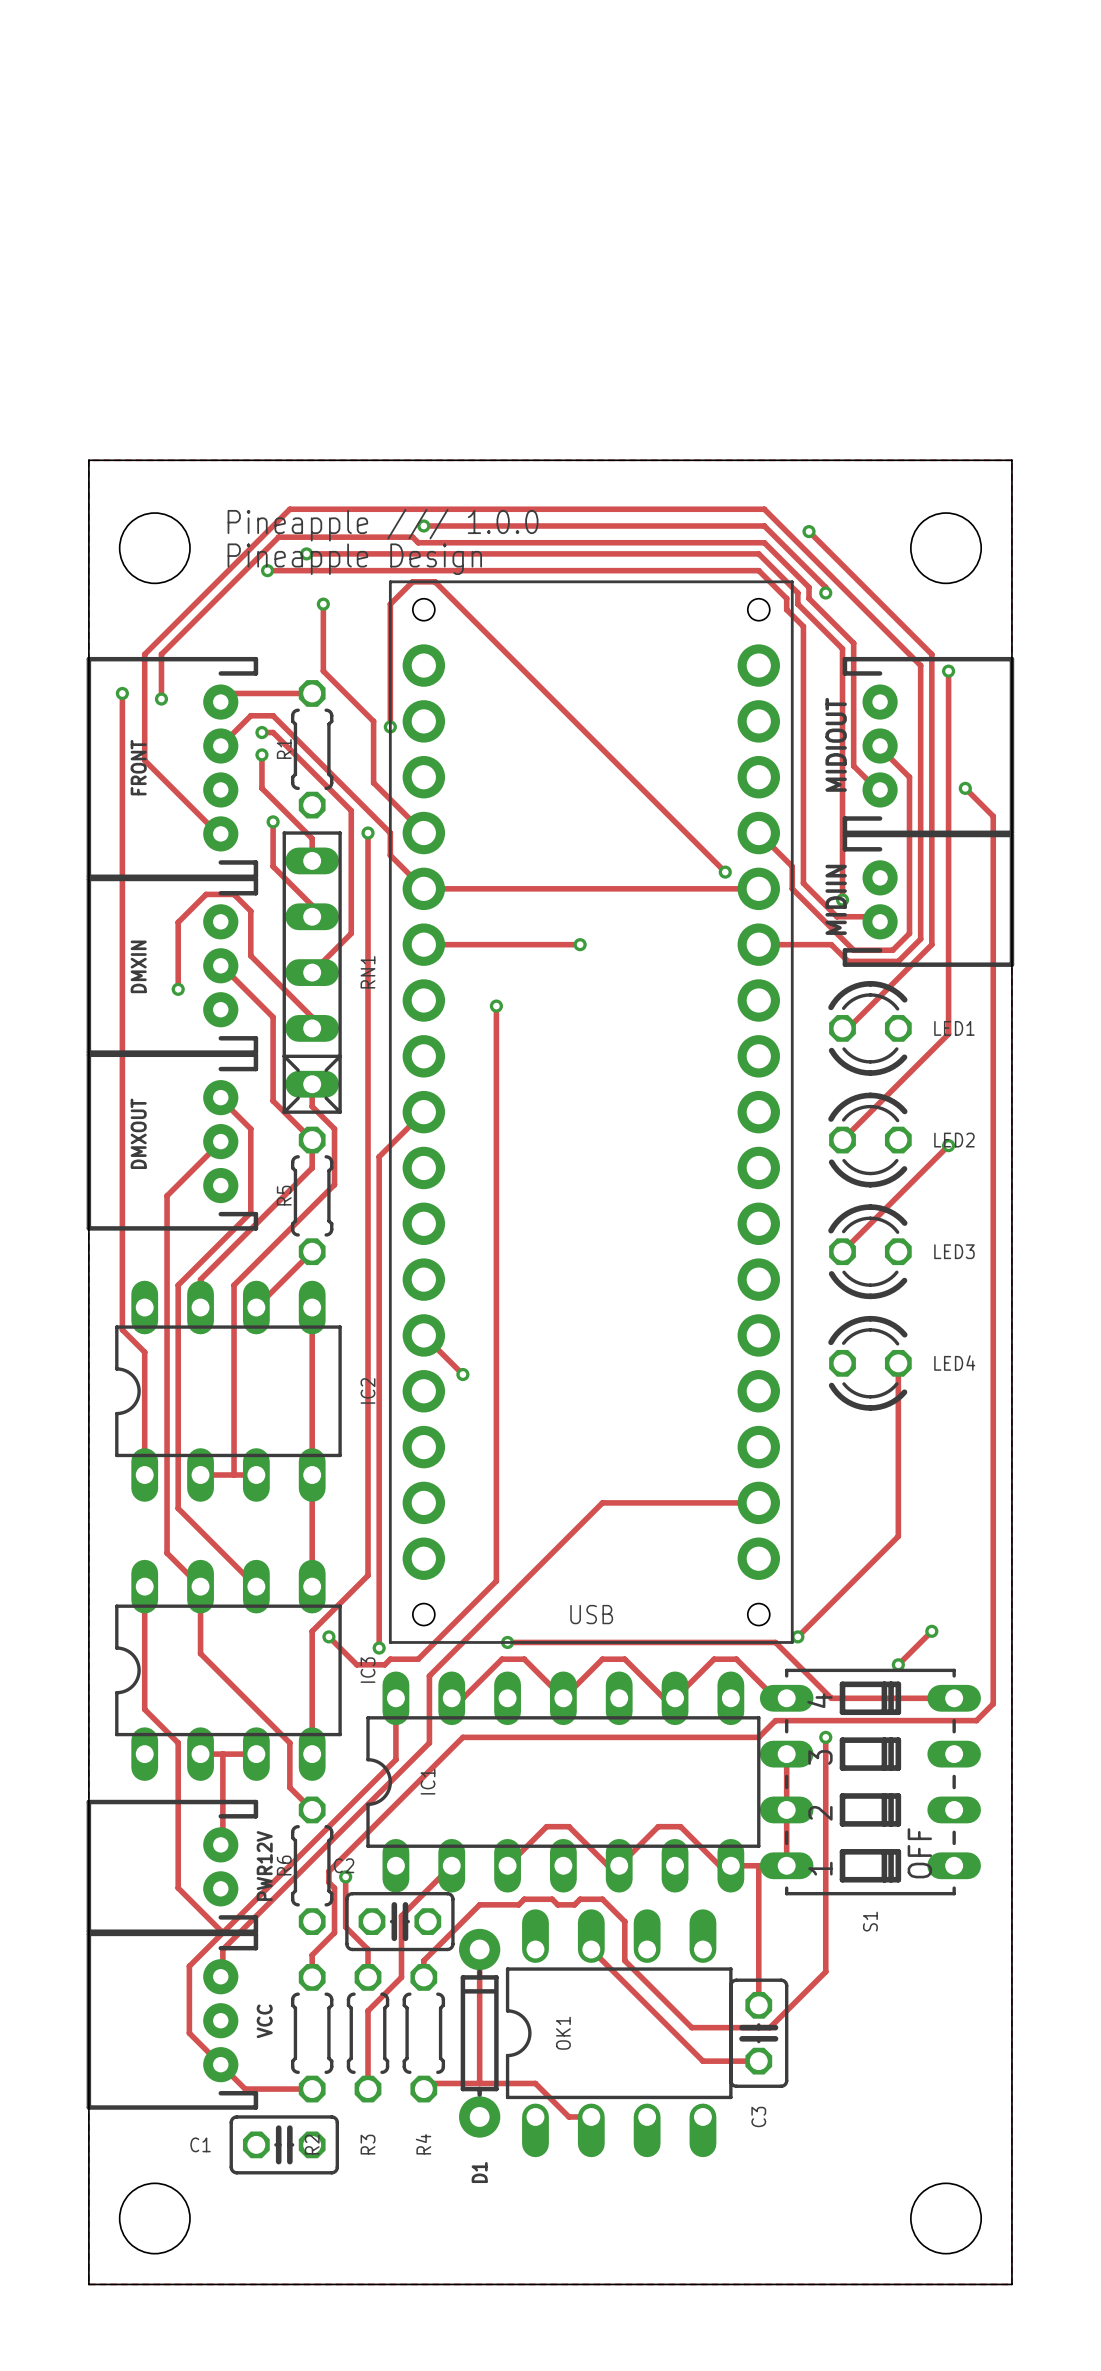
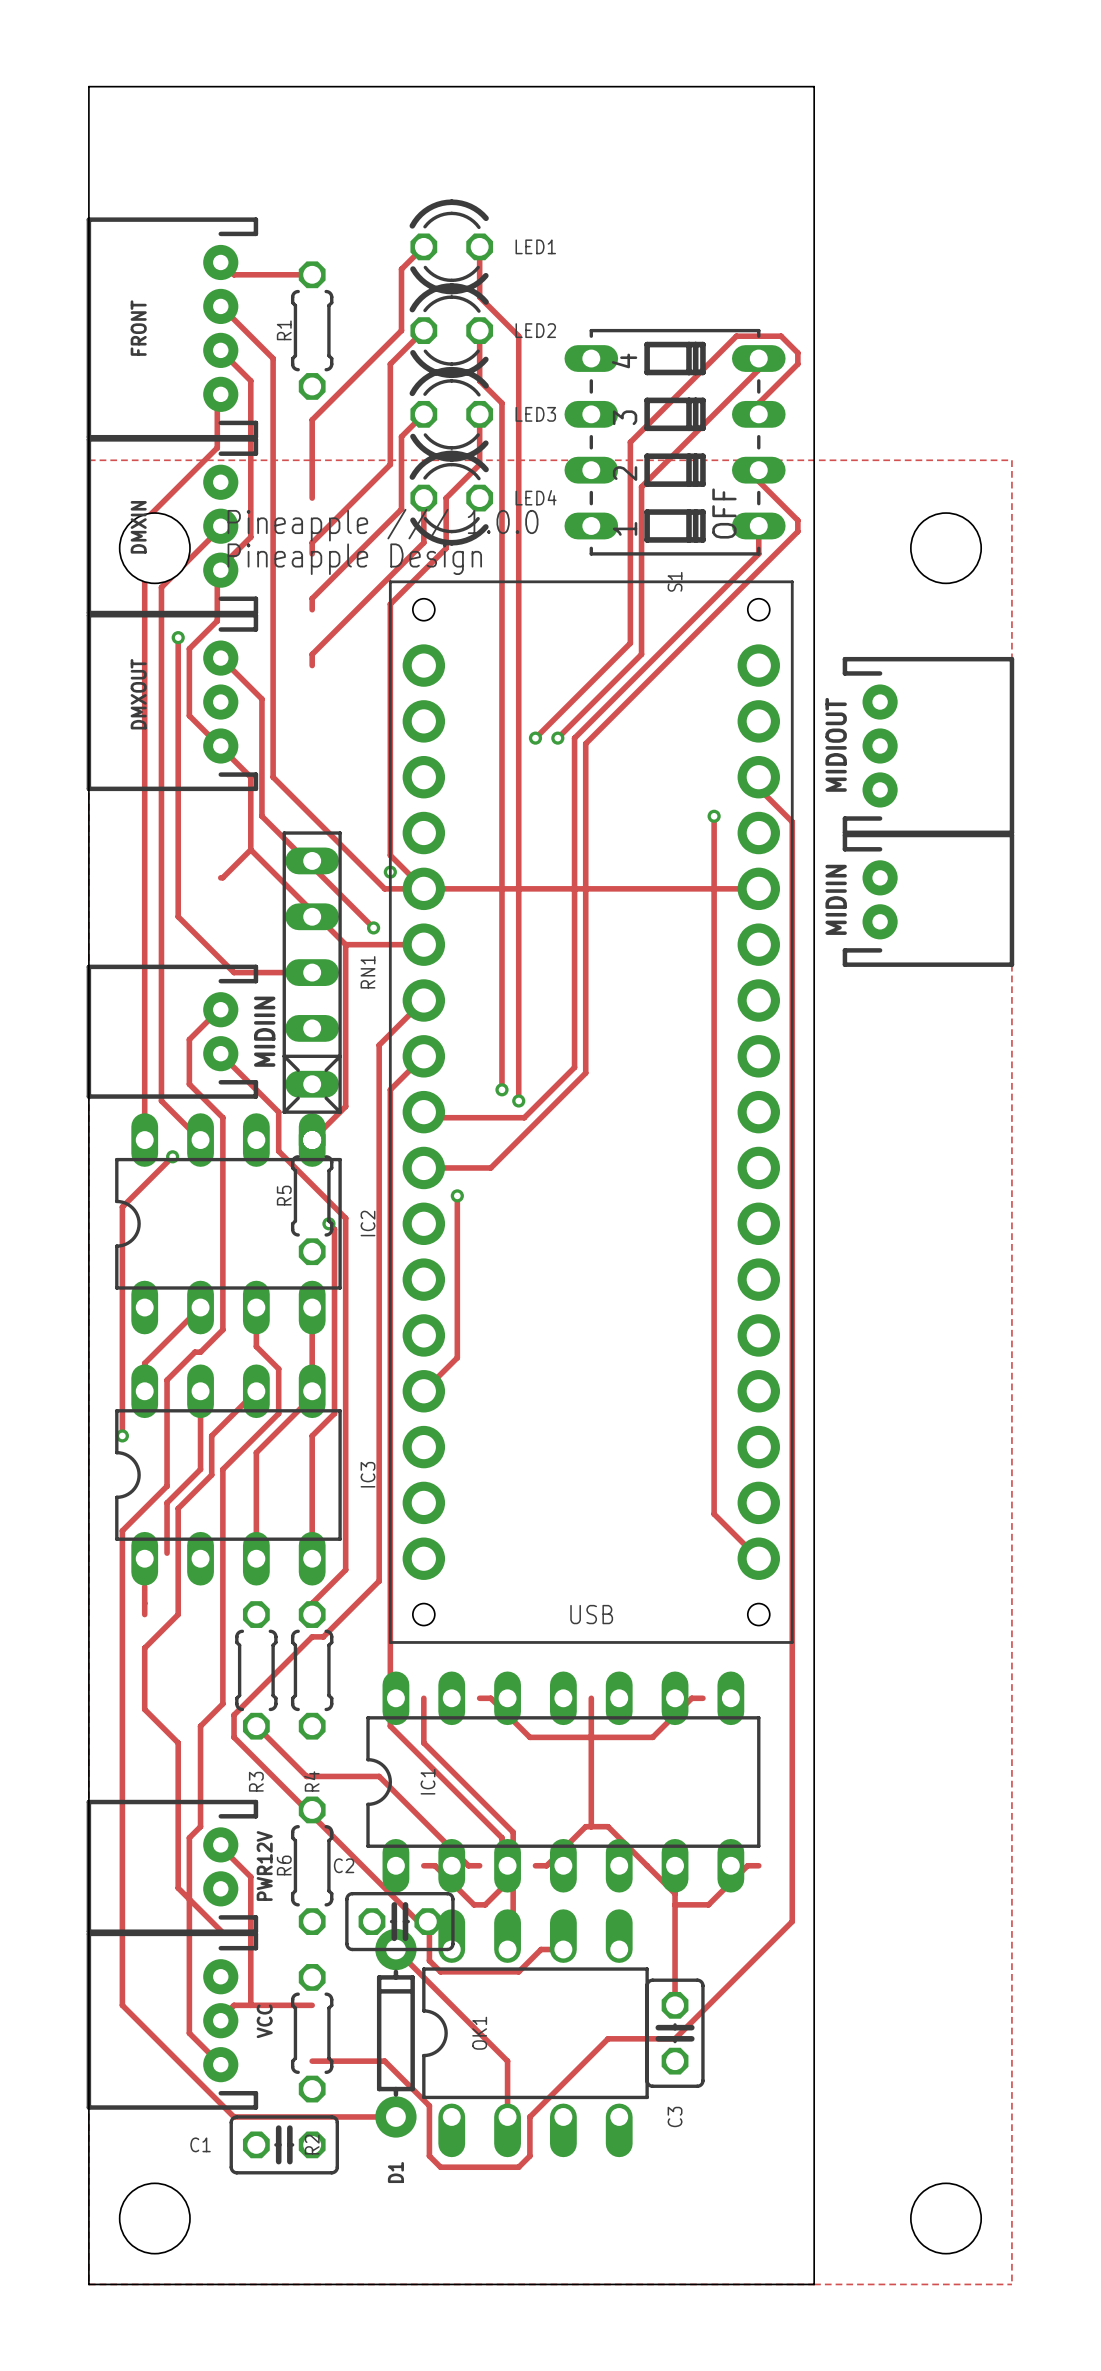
track: none -> (423, 246) (401, 269) (401, 330) (312, 419) (312, 498)
track: none -> (479, 246) (479, 297) (518, 336) (518, 1100)
track: none -> (220, 262) (234, 274) (312, 274)
track: none -> (220, 306) (273, 358) (273, 777) (384, 888) (423, 888)
track: none -> (423, 330) (390, 364) (390, 464) (312, 542) (312, 553)
track: none -> (479, 330) (479, 380) (501, 403) (501, 1089)
track: none -> (220, 350) (250, 380) (250, 537) (222, 565) (220, 570) (217, 570) (217, 620) (189, 648) (189, 715) (250, 777) (250, 849)
track: none -> (758, 358) (758, 369) (641, 486) (641, 654) (557, 738)
track: none -> (423, 414) (401, 436) (401, 509) (312, 598) (312, 609)
track: none -> (758, 414) (758, 403) (797, 364) (797, 352) (781, 336) (736, 336) (630, 442) (630, 643) (535, 738)
board edge: (88, 460) (1011, 460) (1011, 2284) (814, 2284) -> (88, 460) (88, 86) (814, 86) (814, 2284)
track: none -> (758, 470) (758, 481) (797, 520) (797, 531) (585, 743) (585, 1073) (490, 1167) (423, 1167)
track: none -> (423, 498) (423, 542) (312, 654) (312, 665)
track: (423, 526) (764, 526) (825, 587) (825, 592) -> none
via: (423, 526) -> none
track: none -> (758, 526) (758, 553) (574, 738) (574, 1067) (524, 1117) (429, 1117) (423, 1112)
track: (809, 531) (931, 654) (931, 944) (848, 1028) (842, 1028) -> none
via: (809, 531) -> none
track: (306, 553) (758, 553) (797, 592) (797, 604) (842, 648) (842, 900) -> none
via: (306, 553) -> none
track: (267, 570) (758, 570) (786, 598) (786, 609) (803, 626) (803, 883) (836, 916) (876, 916) (880, 921) -> none
via: (267, 570) -> none
track: (412, 581) (435, 581) (725, 872) -> (412, 581) (446, 548) (446, 498) (479, 464) (479, 414)
via: (825, 592) -> none
track: (323, 604) (323, 671) (373, 721) (373, 782) (423, 833) -> none
via: (323, 604) -> none
via: none -> (178, 637)
track: (144, 654) (289, 509) (764, 509) (920, 665) (920, 939) (898, 961) (848, 961) (831, 944) (758, 944) -> (144, 654) (144, 520) (217, 447) (217, 397) (220, 394)
track: (161, 654) (278, 537) (412, 537) (418, 542) (764, 542) (809, 587) (809, 598) (853, 643) (853, 766) (876, 788) (880, 789) -> (161, 654) (161, 587) (220, 526)
track: none -> (220, 658) (261, 699) (261, 754)
track: (948, 671) (948, 1033) (842, 1140) -> none
via: (948, 671) -> none
track: (122, 693) (122, 1207) -> (172, 1156) (122, 1207)
via: (122, 693) -> none
track: (312, 693) (228, 693) (220, 702) -> none
track: none -> (161, 699) (161, 1100) (200, 1140)
via: (161, 699) -> none
via: (390, 726) -> none
track: (261, 732) (273, 732) (351, 810) (351, 933) (312, 972) -> (178, 637) (178, 916) (234, 972) (312, 972)
via: (261, 732) -> none
via: none -> (535, 738)
via: none -> (557, 738)
track: (220, 745) (250, 715) (273, 715) (390, 833) -> (390, 726) (390, 833)
track: (880, 745) (909, 777) (909, 933) (892, 950) (853, 950) (792, 888) -> (312, 2061) (384, 2061) (429, 2105) (429, 2156) (440, 2167) (518, 2167) (529, 2156) (529, 2116) (608, 2038) (675, 2038) (792, 1921) (792, 888)
R1 position: (312, 749) -> (312, 330)
via: (261, 754) -> none
track: (144, 760) (217, 833) (220, 833) -> (144, 760) (144, 1140)
FRONT position: (172, 767) -> (172, 328)
track: (261, 788) (312, 838) (312, 860) -> (261, 788) (261, 816) (373, 927)
track: (965, 788) (993, 816) (993, 1703) (976, 1720) (775, 1720) (758, 1737) (652, 1737) -> (702, 1698) (691, 1698) (652, 1737)
via: (965, 788) -> none
track: none -> (714, 816) (714, 1514) (758, 1558)
track: (273, 821) (273, 866) (312, 905) (312, 916) -> none
via: (273, 821) -> none
track: (368, 833) (368, 1575) (312, 1631) (312, 1754) -> none
via position: (368, 833) -> (390, 872)
track: (758, 833) (792, 866) -> (758, 777) (758, 788) (792, 821) (792, 866)
track: none -> (250, 849) (220, 877)
track: none -> (250, 849) (345, 944)
via position: (725, 872) -> (714, 816)
via: (842, 900) -> none
via: none -> (373, 927)
track: none -> (345, 944) (345, 1106) (312, 1140)
track: (423, 944) (580, 944) -> (423, 944) (345, 944)
via: (580, 944) -> none
DMXIN position: (172, 965) -> (172, 526)
track: (220, 965) (273, 1017) (273, 1100) (312, 1140) (312, 1167) (200, 1279) (200, 1307) -> (144, 1363) (200, 1307)
track: (178, 989) (178, 922) (206, 894) (234, 894) (250, 911) (250, 955) (312, 1017) (312, 1028) -> none
via: (178, 989) -> none
track: (496, 1006) (496, 1581) (418, 1659) (390, 1659) (384, 1664) (356, 1664) (328, 1636) -> none
via: (496, 1006) -> none
LED1 position: (869, 1028) -> (451, 246)
MIDIIN: none -> (172, 1031)
track: none -> (220, 1053) (278, 1112) (278, 1151) (345, 1218) (345, 1569) (312, 1603) (312, 1614)
track: (312, 1084) (312, 1106) (334, 1128) (334, 1184) (234, 1285) (234, 1475) -> none
via: none -> (501, 1089)
track: (220, 1097) (250, 1128) (250, 1212) (178, 1285) (178, 1508) (256, 1586) -> none
via: none -> (518, 1100)
track: (423, 1112) (379, 1156) -> (423, 1000) (379, 1045) (379, 1156)
LED2 position: (869, 1140) -> (451, 330)
DMXOUT position: (172, 1141) -> (172, 702)
track: (220, 1141) (167, 1195) (167, 1380) -> (220, 1009) (189, 1039) (189, 1084) (222, 1117) (222, 1329) (200, 1352) (194, 1352) (167, 1380)
track: (948, 1145) (842, 1251) -> none
via: (948, 1145) -> none
via: none -> (172, 1156)
track: none -> (457, 1195) (457, 1357) (423, 1391)
via: none -> (457, 1195)
track: none -> (328, 1223) (334, 1229) (334, 1413) (312, 1435)
via: none -> (328, 1223)
track: (312, 1251) (256, 1307) -> none
LED3 position: (869, 1251) -> (451, 414)
track: (122, 1329) (144, 1352) (144, 1363) -> (122, 1329) (122, 1435)
track: (423, 1335) (462, 1374) -> none
LED4 position: (869, 1363) -> (451, 498)
track: (898, 1363) (898, 1536) (797, 1636) -> none
via: (462, 1374) -> none
track: (144, 1391) (144, 1475) -> none
IC2 position: (228, 1391) -> (228, 1223)
track: (312, 1396) (312, 1435) -> (312, 1396) (256, 1452) (256, 1558)
via: none -> (122, 1435)
track: (200, 1475) (256, 1475) -> none
track: (167, 1486) (167, 1502) -> (200, 1391) (200, 1469) (167, 1502)
track: none -> (167, 1486) (122, 1530) (122, 2005) (234, 2116) (395, 2116)
track: (758, 1502) (602, 1502) (429, 1675) (429, 1742) (222, 1949) (222, 1971) (220, 1976) -> none
track: (167, 1553) (200, 1586) (200, 1653) (289, 1742) (289, 1787) (312, 1809) -> none
track: (379, 1581) (379, 1648) -> (379, 1581) (323, 1636) (312, 1636) (234, 1715) (234, 1737) (429, 1932) (429, 1960) (440, 1971) (518, 1971) (541, 1949) (563, 1949)
track: (144, 1614) (144, 1648) -> (256, 1391) (211, 1435) (211, 1475) (178, 1508) (178, 1614) (144, 1648)
track: (931, 1631) (898, 1664) -> none
via: (931, 1631) -> none
via: (328, 1636) -> none
via: (797, 1636) -> none
track: (507, 1642) (775, 1642) (831, 1698) (954, 1698) -> none
via: (507, 1642) -> none
via: (379, 1648) -> none
via: (898, 1664) -> none
IC3 position: (228, 1670) -> (228, 1475)
track: (395, 1698) (395, 1759) (189, 1966) -> (256, 1307) (256, 1346) (278, 1368) (278, 1413) (222, 1469) (222, 1703) (200, 1726) (200, 1826) (189, 1837) (189, 1966)
track: none -> (423, 1698) (423, 1742) (513, 1832) (513, 1943) (507, 1949)
track: (451, 1698) (462, 1698) (501, 1659) (524, 1659) (563, 1698) (602, 1659) (624, 1659) (663, 1698) (675, 1698) (714, 1659) (736, 1659) (775, 1698) (786, 1698) -> none
track: none -> (591, 1698) (591, 1826)
track: none -> (256, 1726) (306, 1776) (379, 1776) (468, 1865) (479, 1865)
track: (529, 1737) (462, 1737) (328, 1871) (328, 1882) (334, 1888) (334, 1932) (312, 1955) (312, 1977) -> (529, 1737) (490, 1698) (479, 1698)
track: (825, 1737) (825, 1971) (769, 2027) (691, 2027) (624, 1960) (624, 1921) (602, 1899) (580, 1899) (574, 1904) (557, 1904) (552, 1899) (524, 1899) (518, 1904) (485, 1904) -> (423, 1056) (390, 1089) (390, 1726) (501, 1837) (501, 1888) (485, 1904)
via: (825, 1737) -> none
track: (200, 1754) (256, 1754) -> none
track: (222, 1754) (222, 1843) (220, 1844) -> (250, 2005) (250, 1876) (220, 1844)
track: (786, 1754) (786, 1865) (758, 1865) (758, 2005) -> none
S1 position: (870, 1782) -> (675, 442)
track: (451, 1865) (401, 1916) (401, 1977) (368, 2010) (368, 2089) -> none
track: (507, 1865) (546, 1826) (568, 1826) (608, 1865) (619, 1865) (658, 1826) (680, 1826) (719, 1865) (747, 1865) -> (675, 1904) (708, 1904) (747, 1865)
track: none -> (535, 1865) (546, 1865) (585, 1826) (608, 1826) (675, 1893) (675, 2005)
track: (345, 1876) (345, 1927) (368, 1949) (368, 1977) -> none
via: (345, 1876) -> none
track: (479, 1904) (423, 1960) (423, 1977) -> (479, 1904) (474, 1904) (435, 1865) (423, 1865)
track: none -> (395, 1949) (507, 2061) (507, 2116)
track: (479, 1949) (479, 2083) -> none
track: (591, 1949) (702, 2061) (758, 2061) -> none
track: none -> (312, 2005) (234, 2005) (220, 2020)
R3 position: (368, 2033) -> (256, 1670)
R4 position: (423, 2033) -> (312, 1670)
D1 position: (479, 2033) -> (395, 2033)
OK1 position: (619, 2033) -> (535, 2033)
C3 position: (758, 2033) -> (675, 2033)
track: (220, 2064) (245, 2089) (312, 2089) -> none
track: (423, 2089) (429, 2083) (535, 2083) (568, 2116) (591, 2116) -> none

